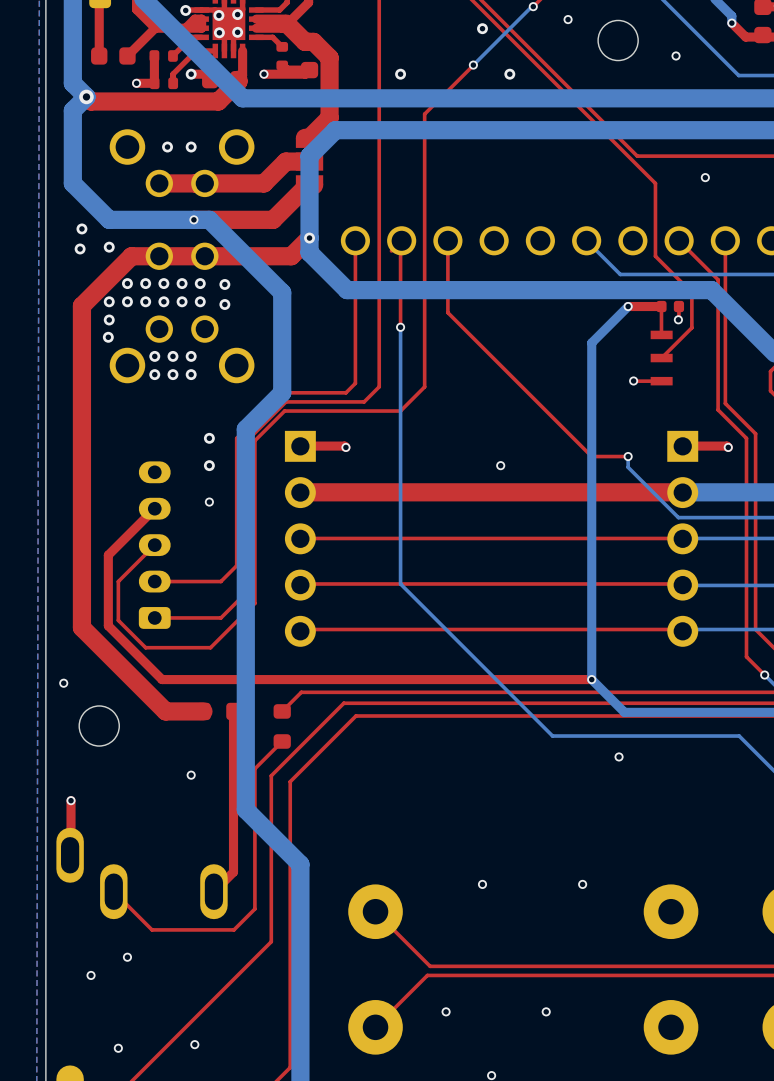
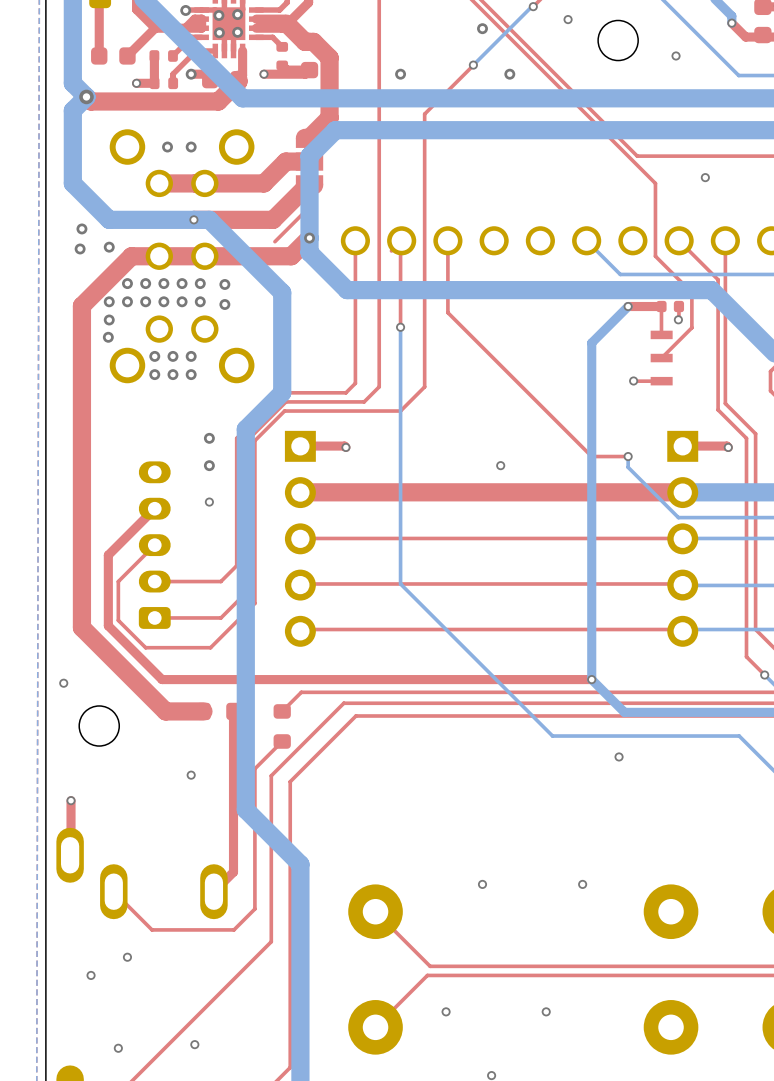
top track: none -> (307, 185) (307, 208) (274, 241)

